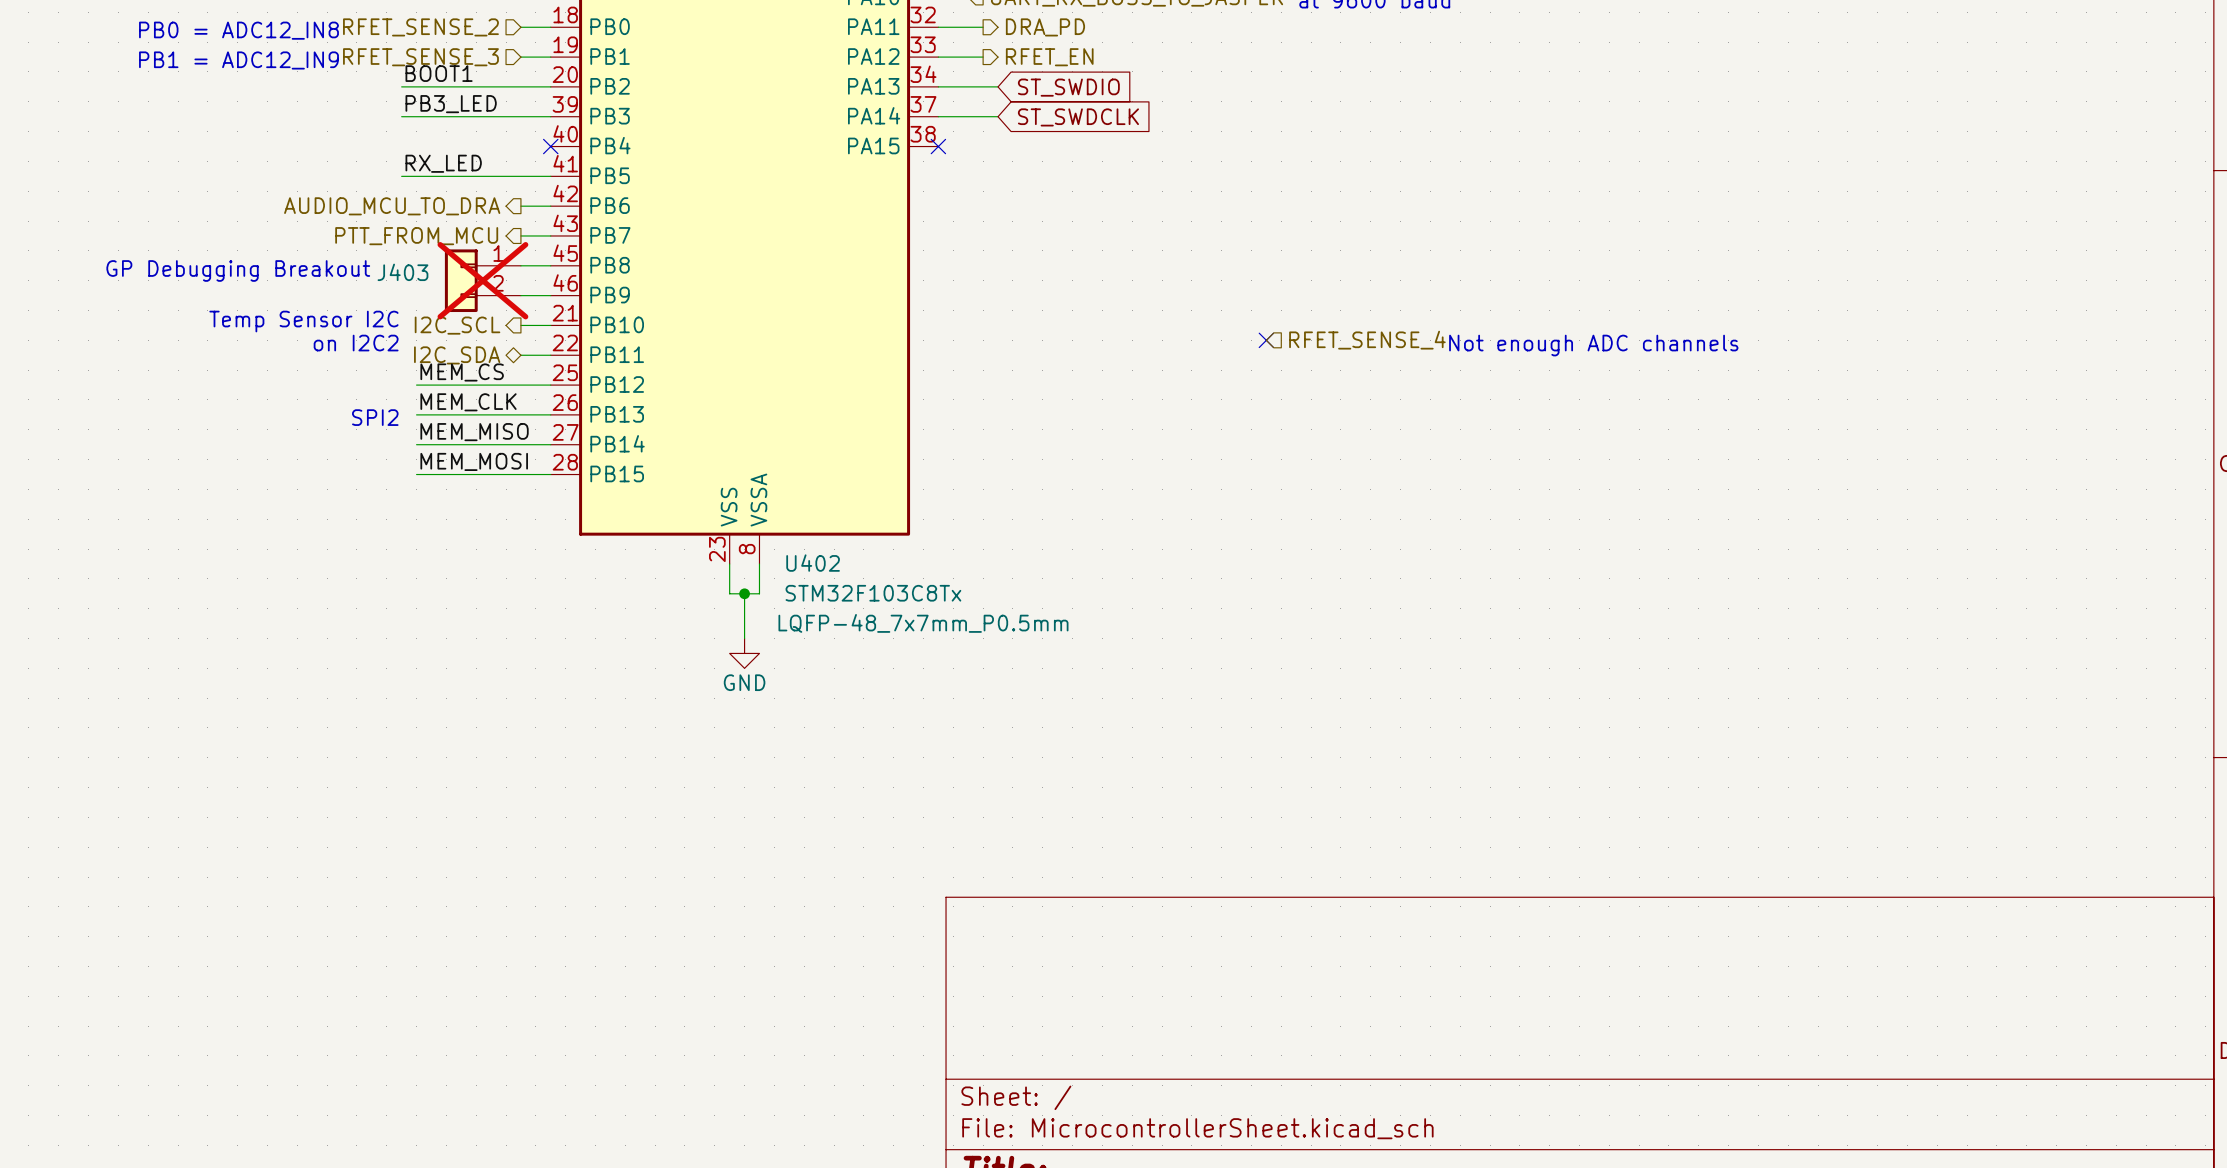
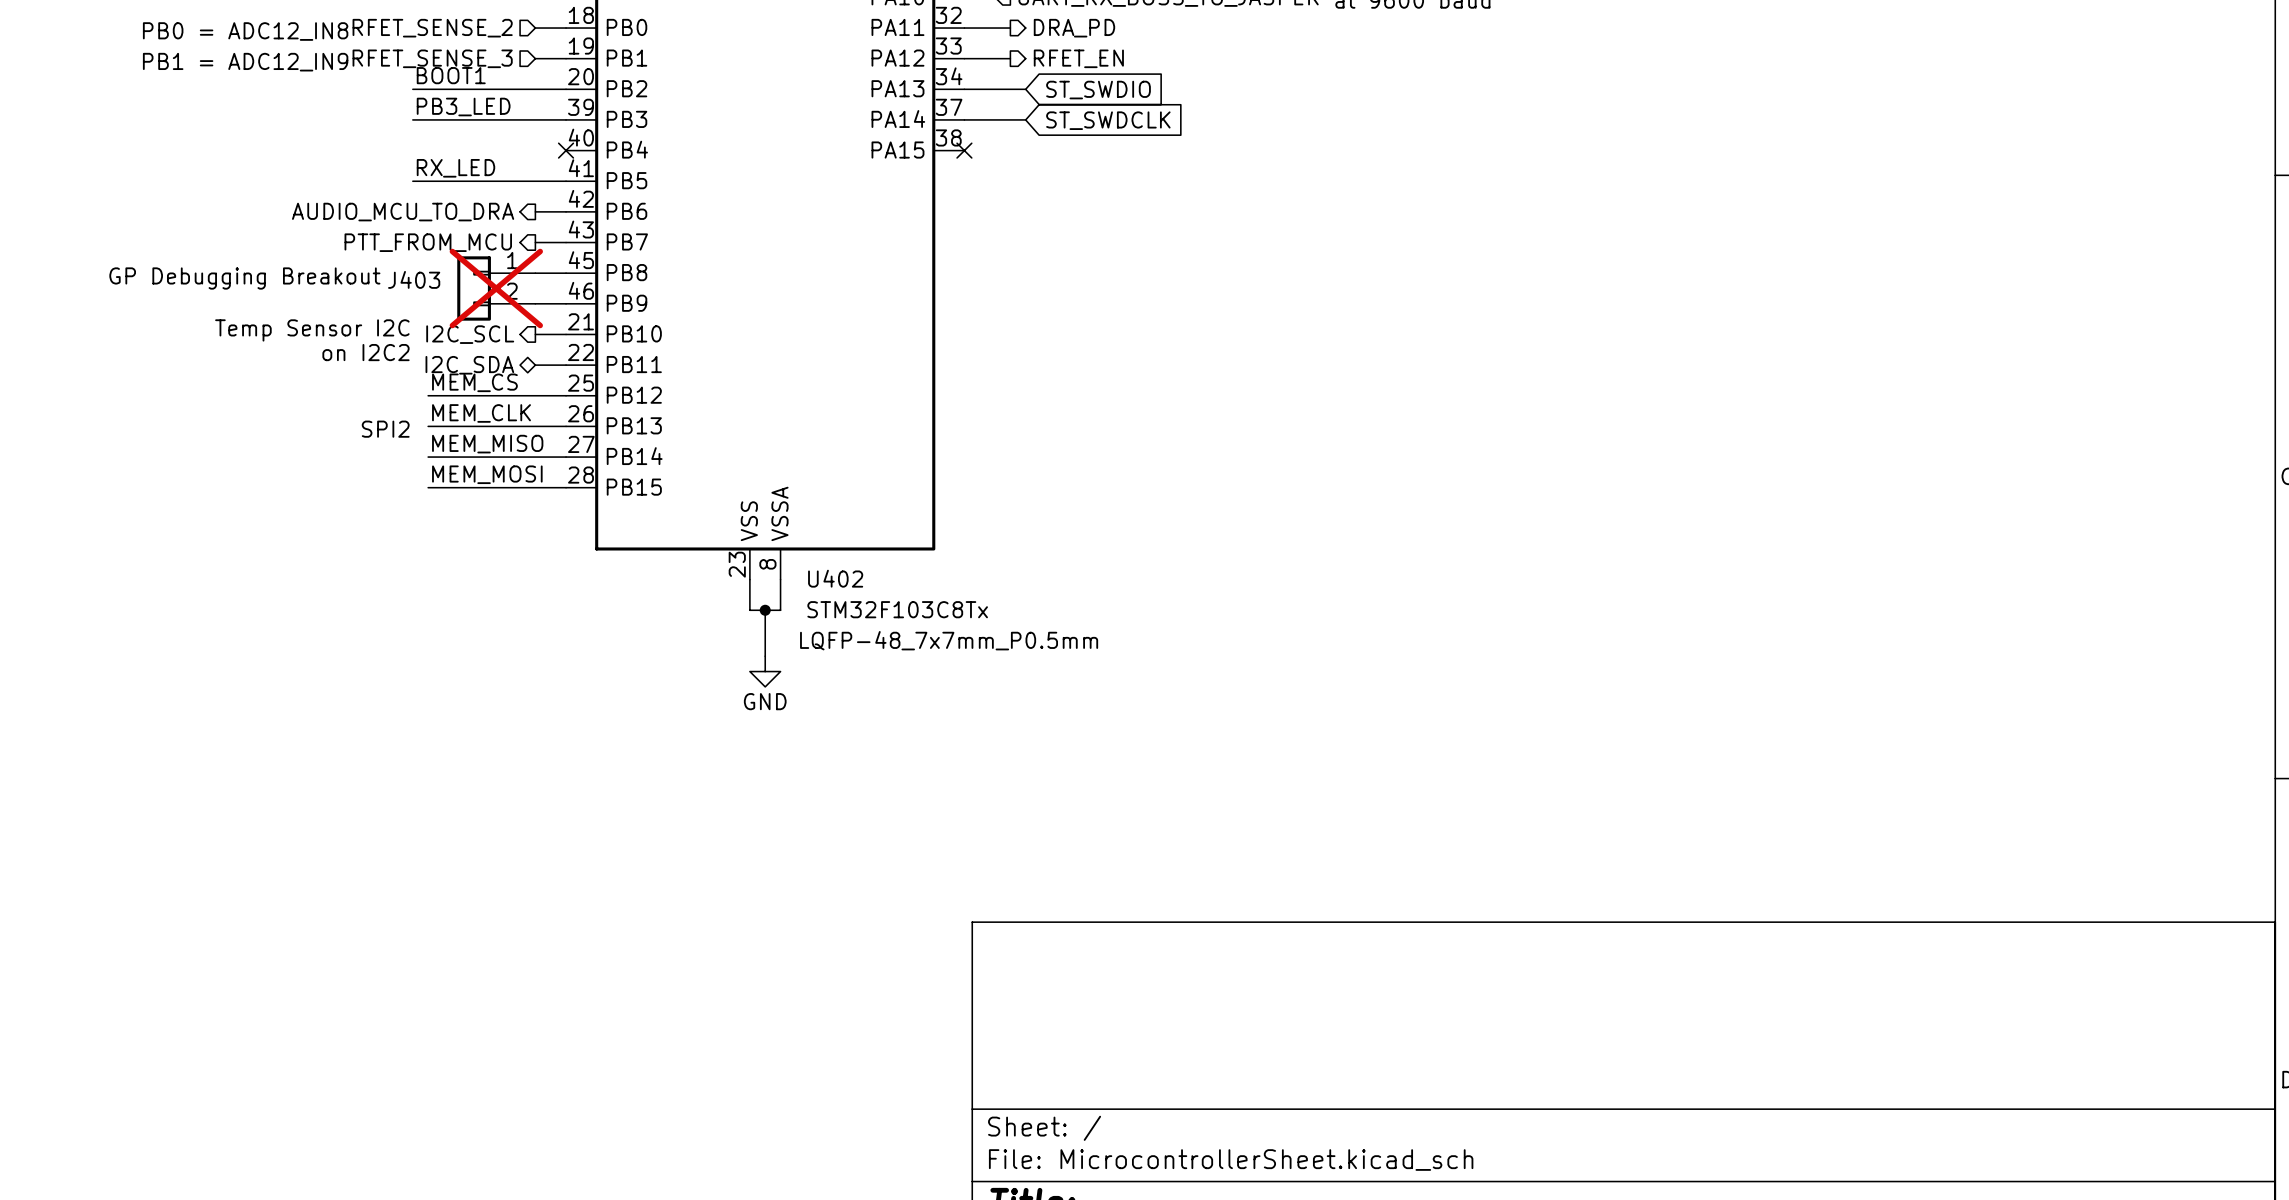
no-connect mark: (1266, 340) -> none
hierarchical label: RFET_SENSE_4 (1367, 340) -> none
text: Not enough ADC channels (1593, 345) -> none

